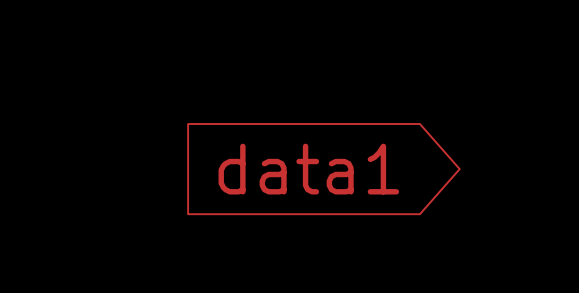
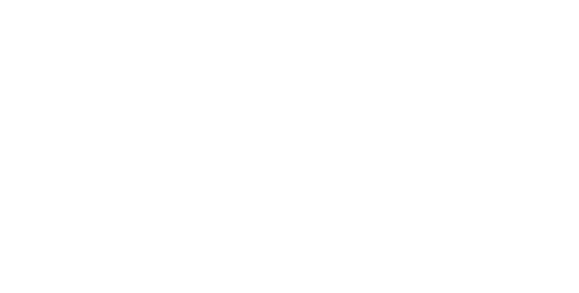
global label: data1 (308, 169) -> none

